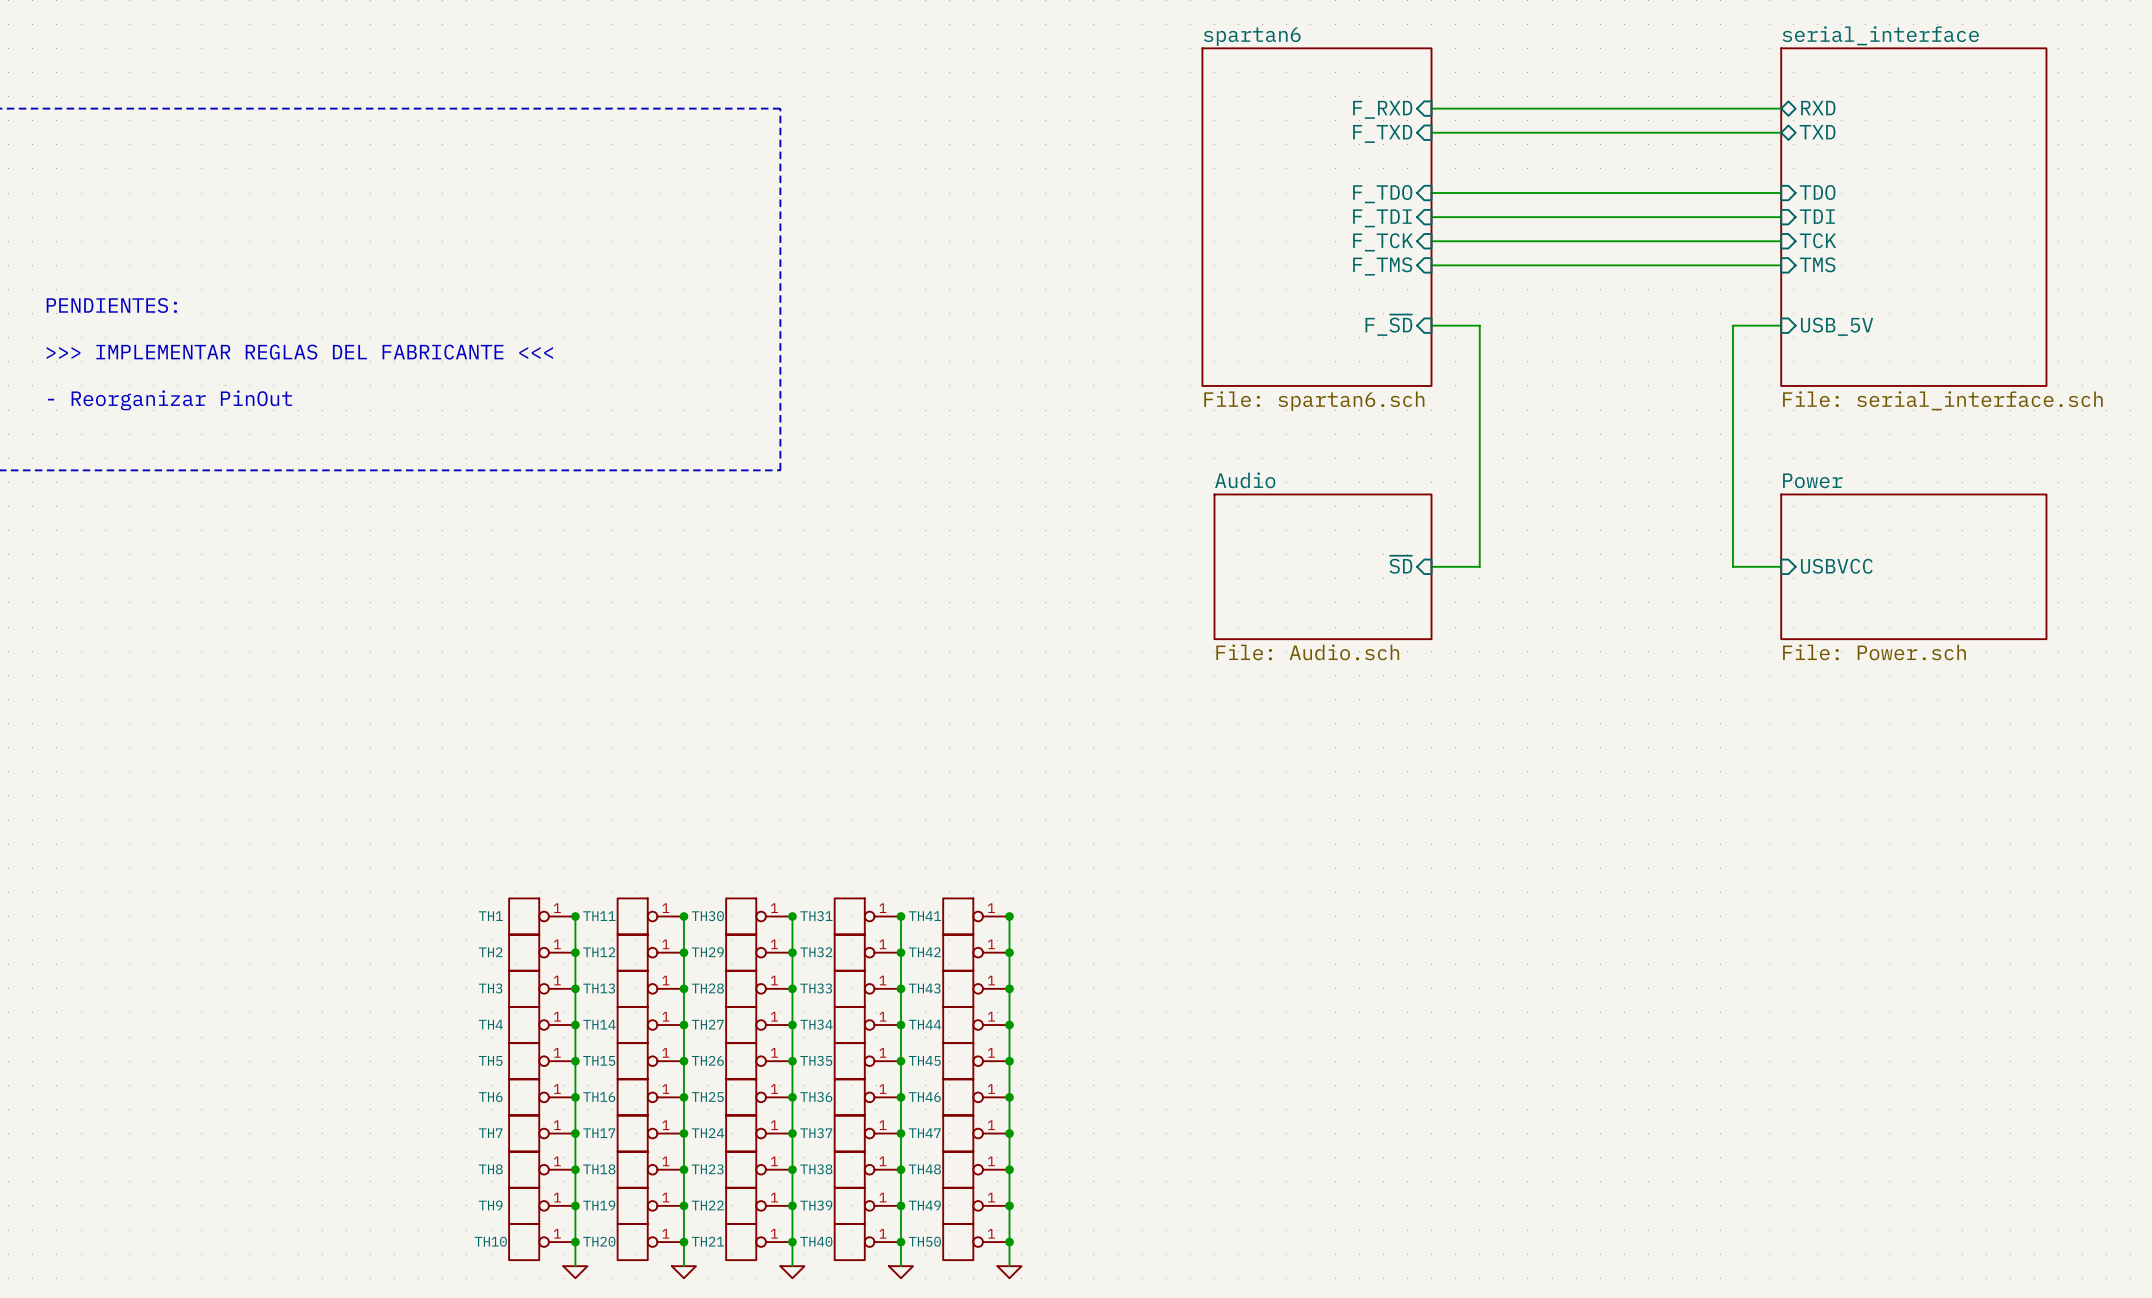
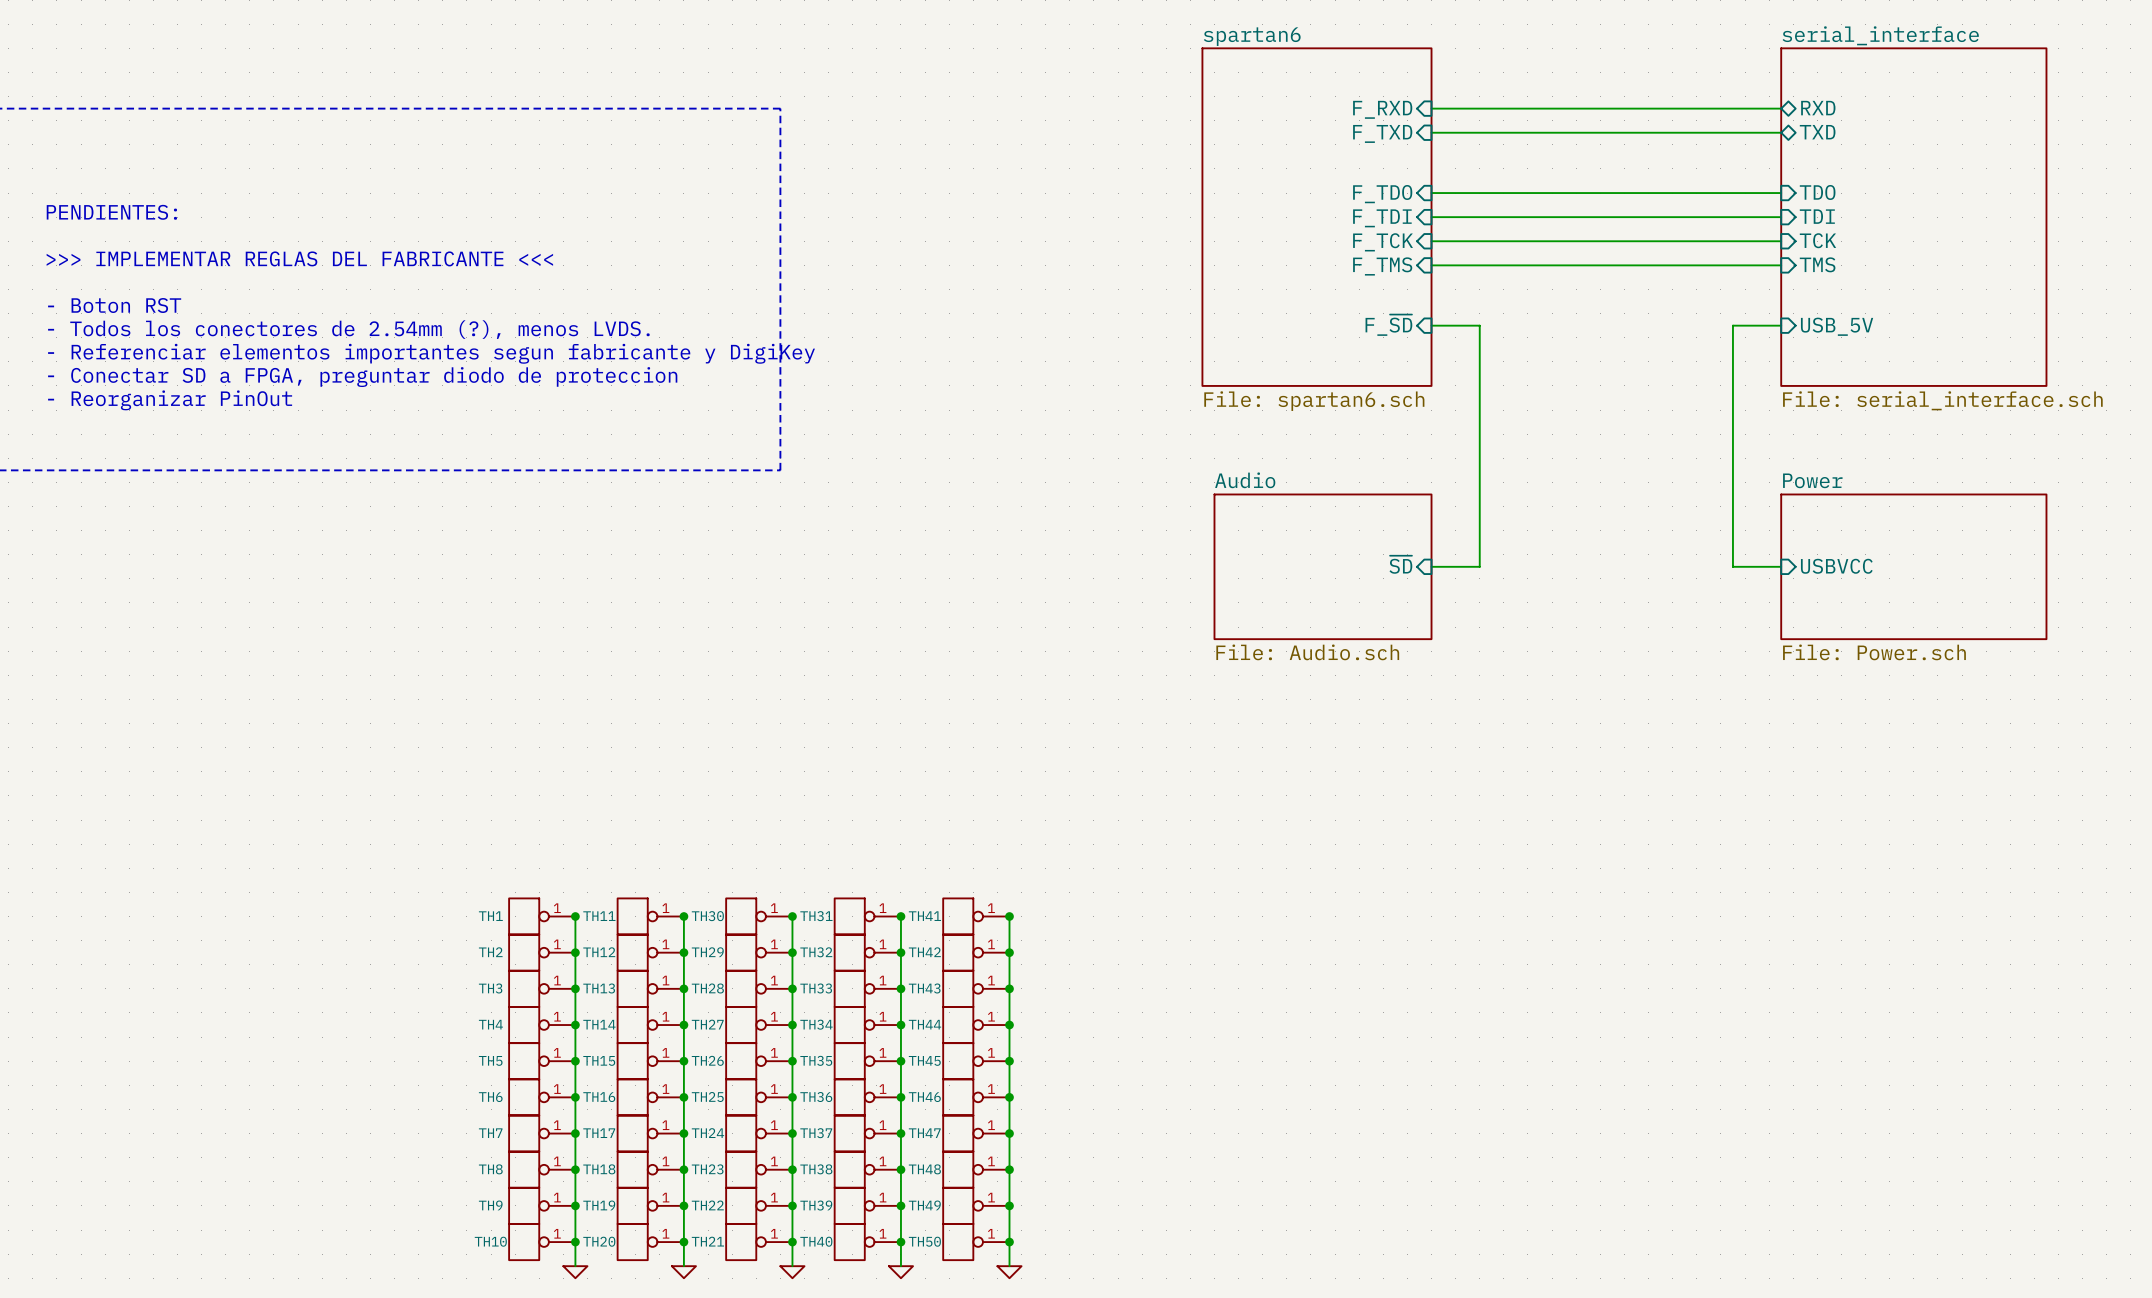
text: none -> PENDIENTES: (111, 212)
text: none -> >>> IMPLEMENTAR REGLAS DEL FABRICANTE <<< (299, 258)
text: PENDIENTES: (111, 305) -> - Boton RST (114, 305)
text: none -> - Todos los conectores de 2.54mm (?), menos LVDS. (348, 329)
text: >>> IMPLEMENTAR REGLAS DEL FABRICANTE <<< (299, 352) -> - Referenciar elementos importantes segun fabricante y DigiKey (431, 353)
text: none -> - Conectar SD a FPGA, preguntar diodo de proteccion (362, 377)

